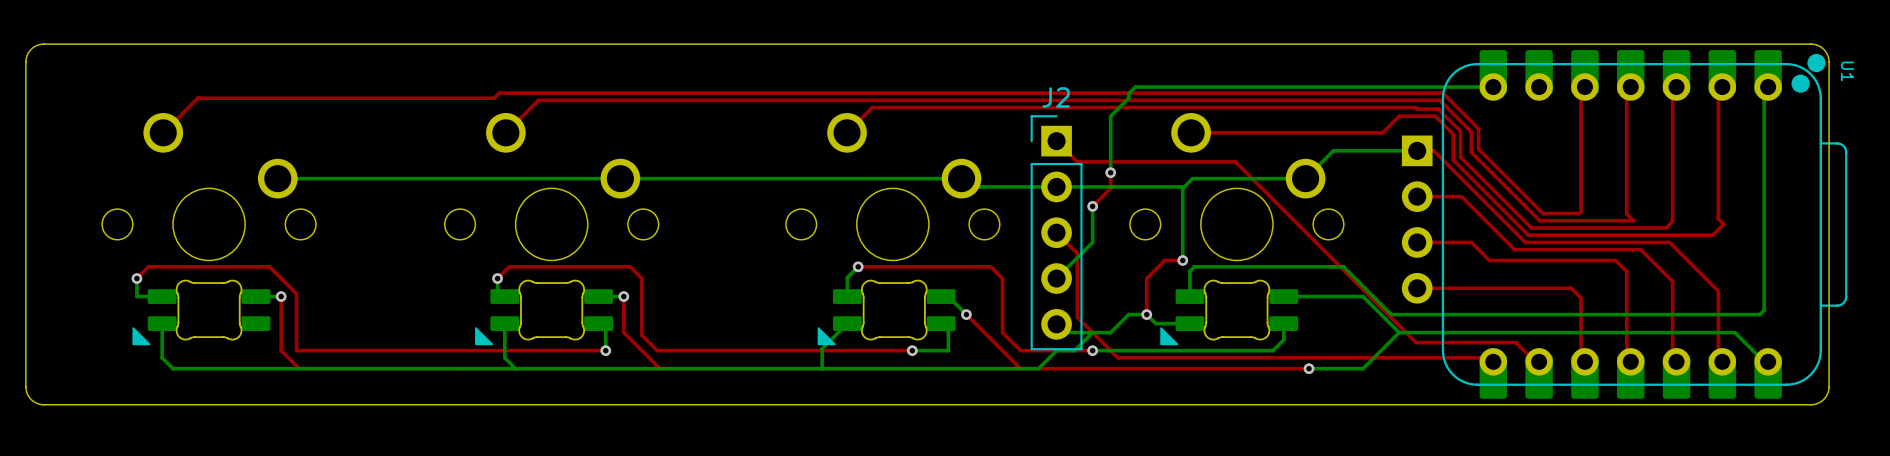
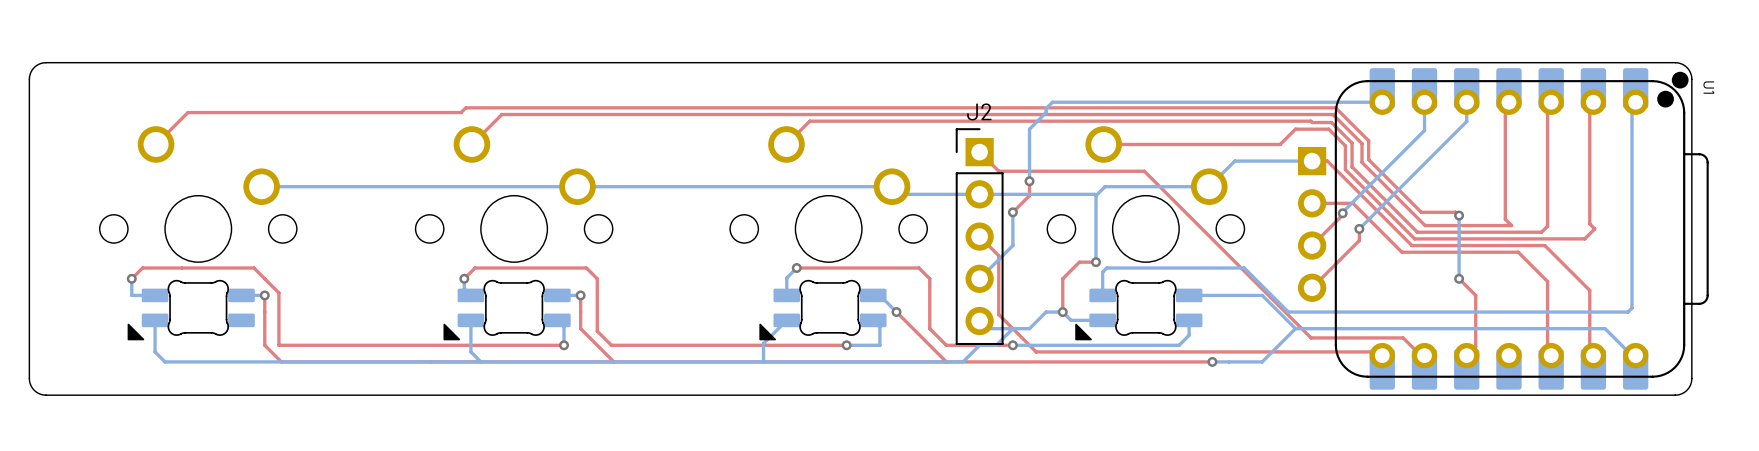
bottom track: none -> (1424, 102) (1424, 130) (1342, 213)
top track: (1584, 87) (1580, 90) (1580, 212) (1542, 213) (1535, 206) -> (1459, 215) (1455, 212) (1421, 212)
bottom track: none -> (1466, 102) (1466, 121) (1359, 228)
via: none -> (1342, 213)
bottom track: none -> (1459, 215) (1459, 278)
via: none -> (1459, 215)
via: none -> (1359, 228)
top track: (1417, 242) (1471, 242) (1489, 260) (1615, 260) (1626, 271) (1626, 357) -> (1312, 245) (1342, 213)
top track: none -> (1459, 278) (1475, 295) (1475, 346) (1471, 350)
via: none -> (1459, 278)
top track: (1417, 288) (1571, 288) (1580, 298) (1580, 357) -> (1312, 287) (1359, 240) (1359, 228)

